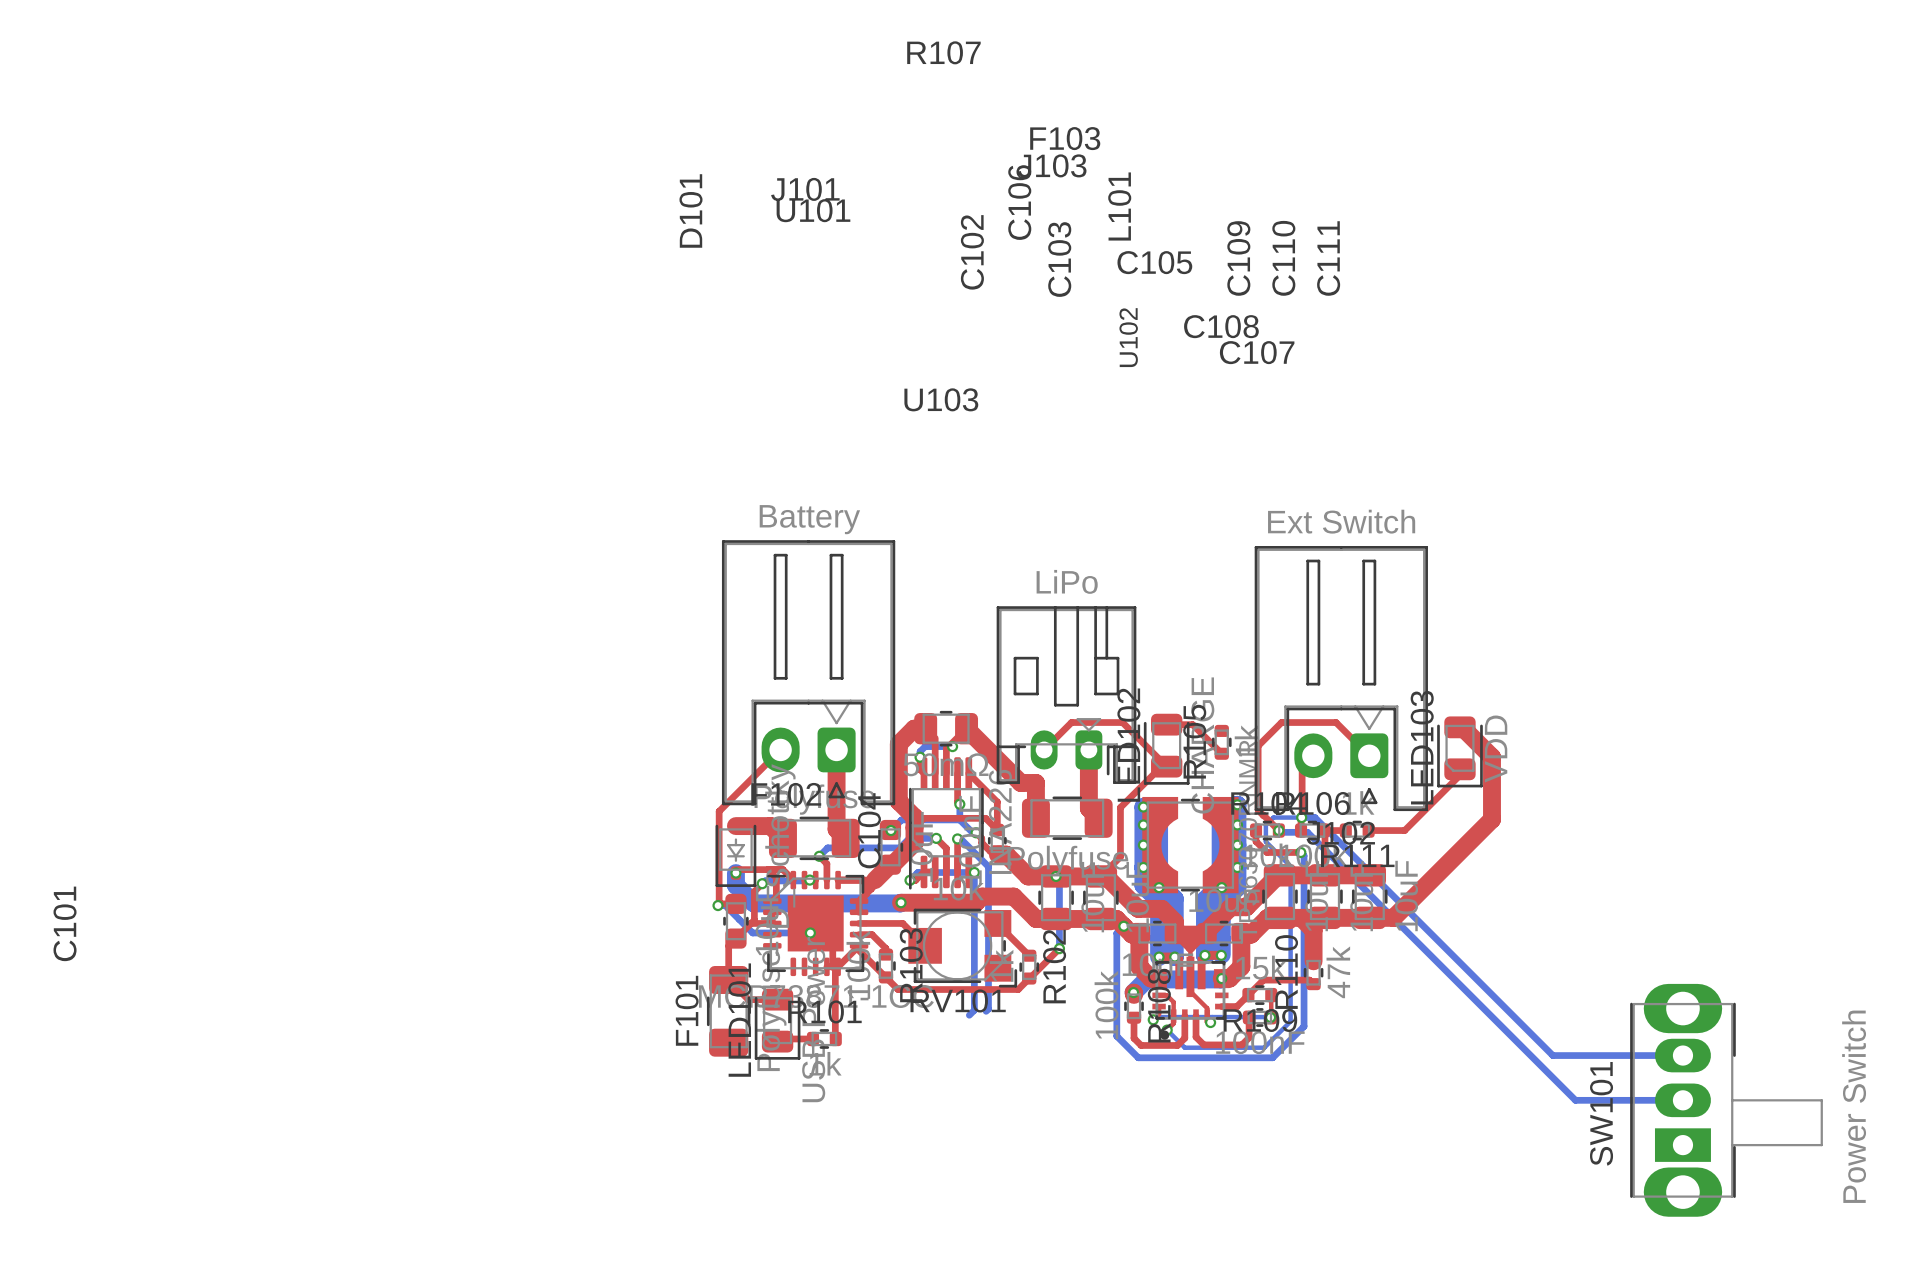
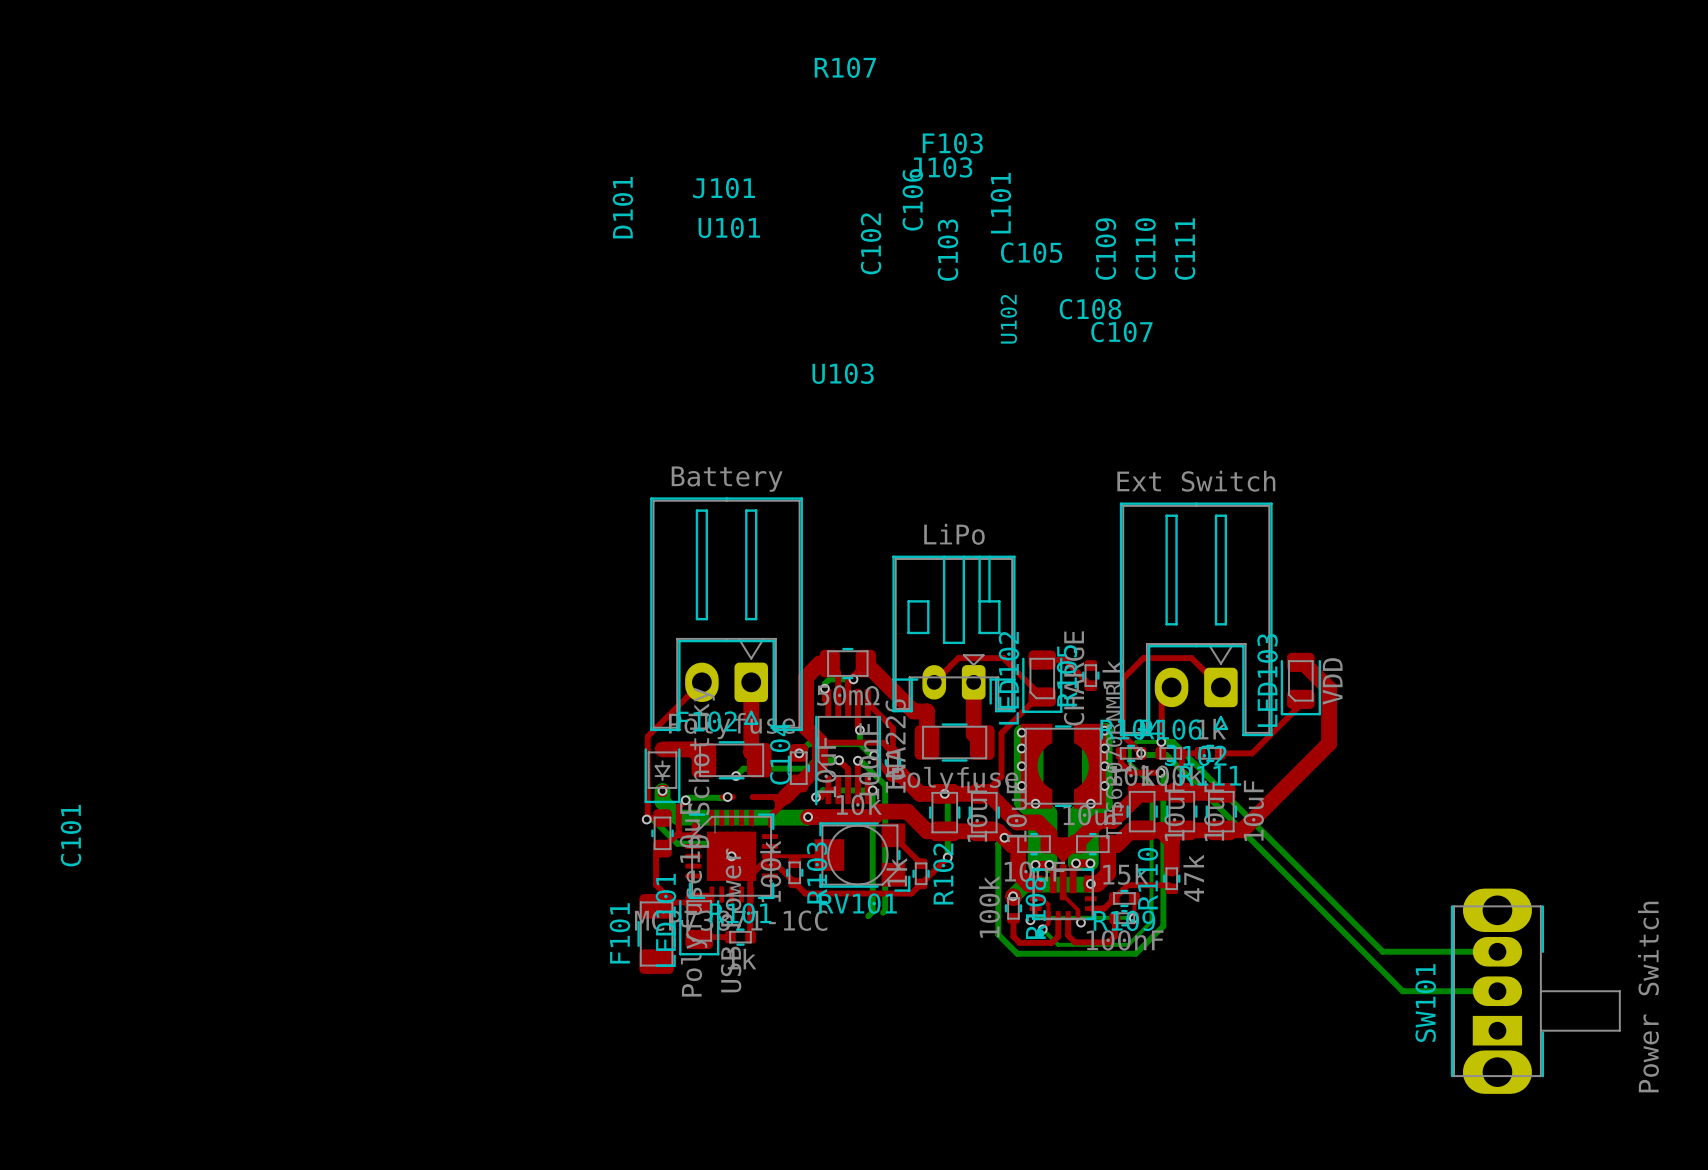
top track: (819, 856) (826, 863) (826, 880) -> none
top track: (739, 869) (782, 869) (793, 880) -> none
top track: (768, 869) (776, 877) (776, 897) (772, 901) -> none
U101 position: (815, 923) -> (731, 856)
top track: (859, 923) (902, 923) (922, 943) -> none
via position: (810, 932) -> (731, 856)
top track: (859, 934) (872, 934) (885, 948) (885, 954) -> none
top track: none -> (829, 855) (769, 856)
F101 position: (728, 1011) -> (656, 933)

